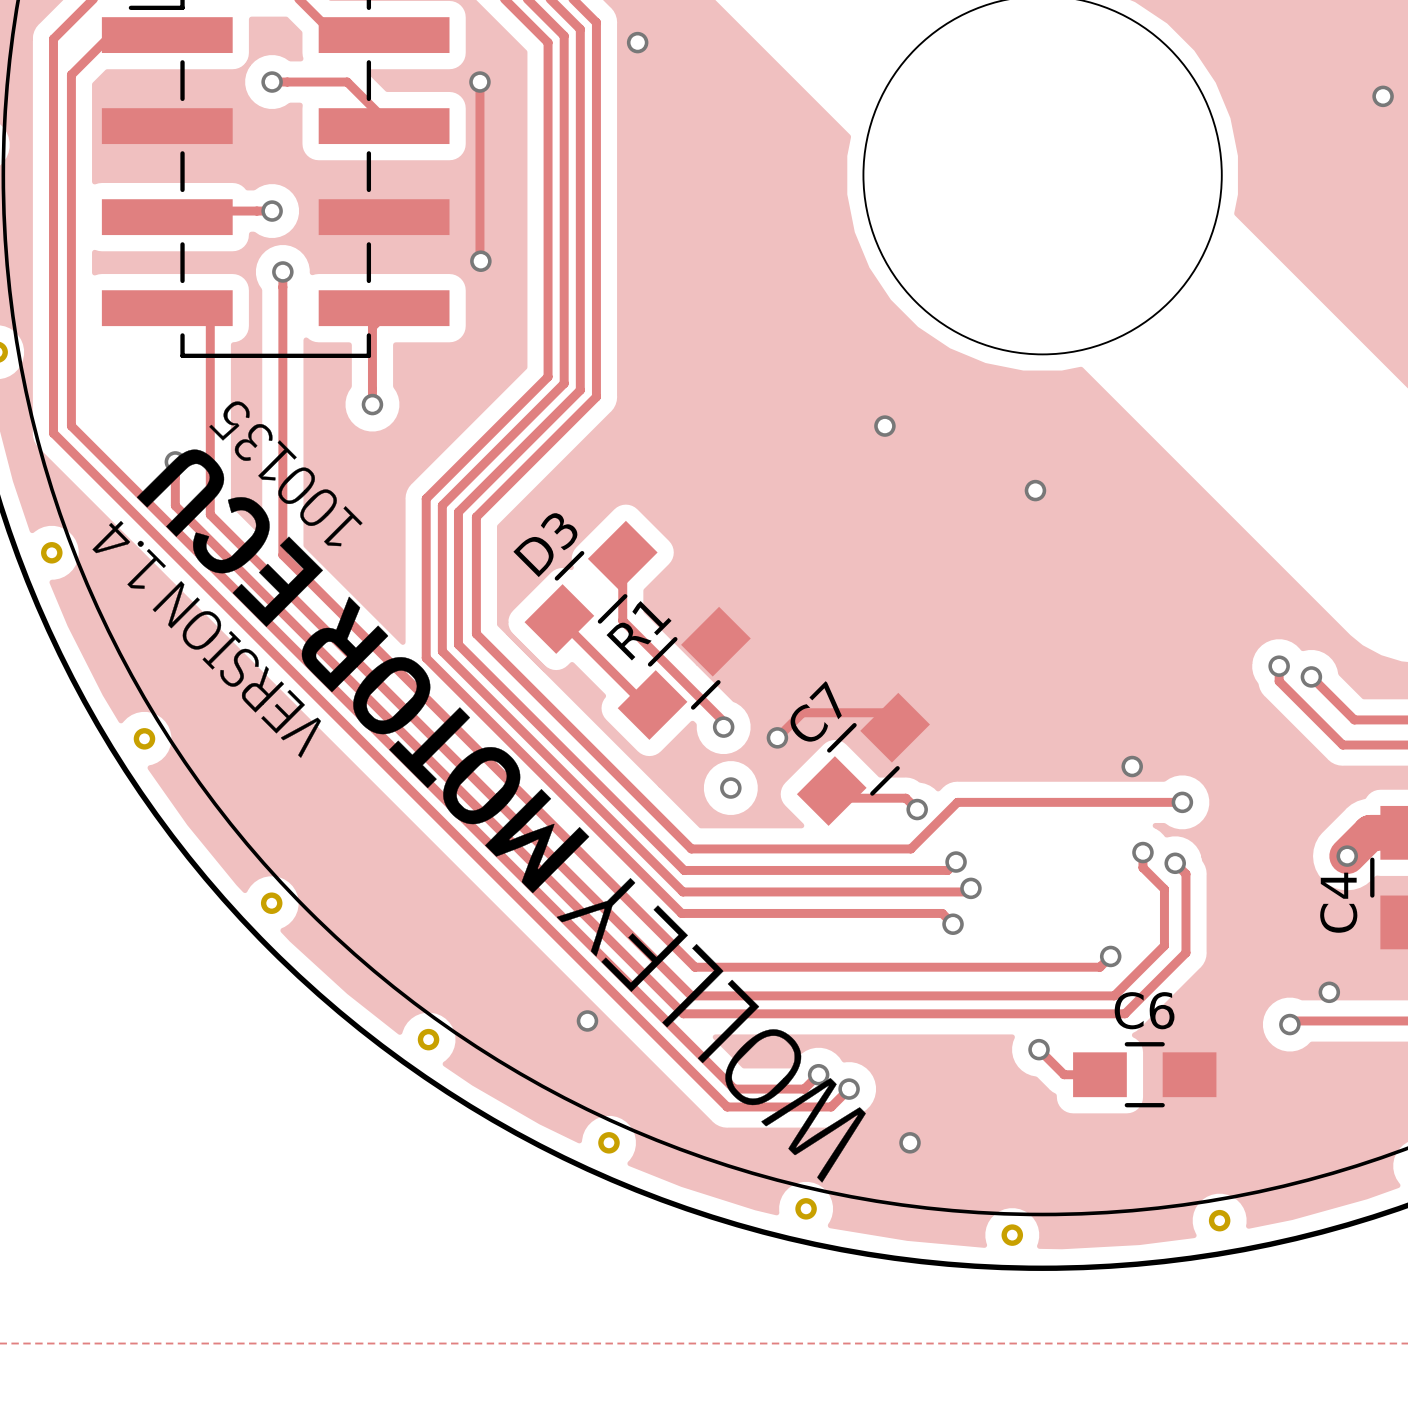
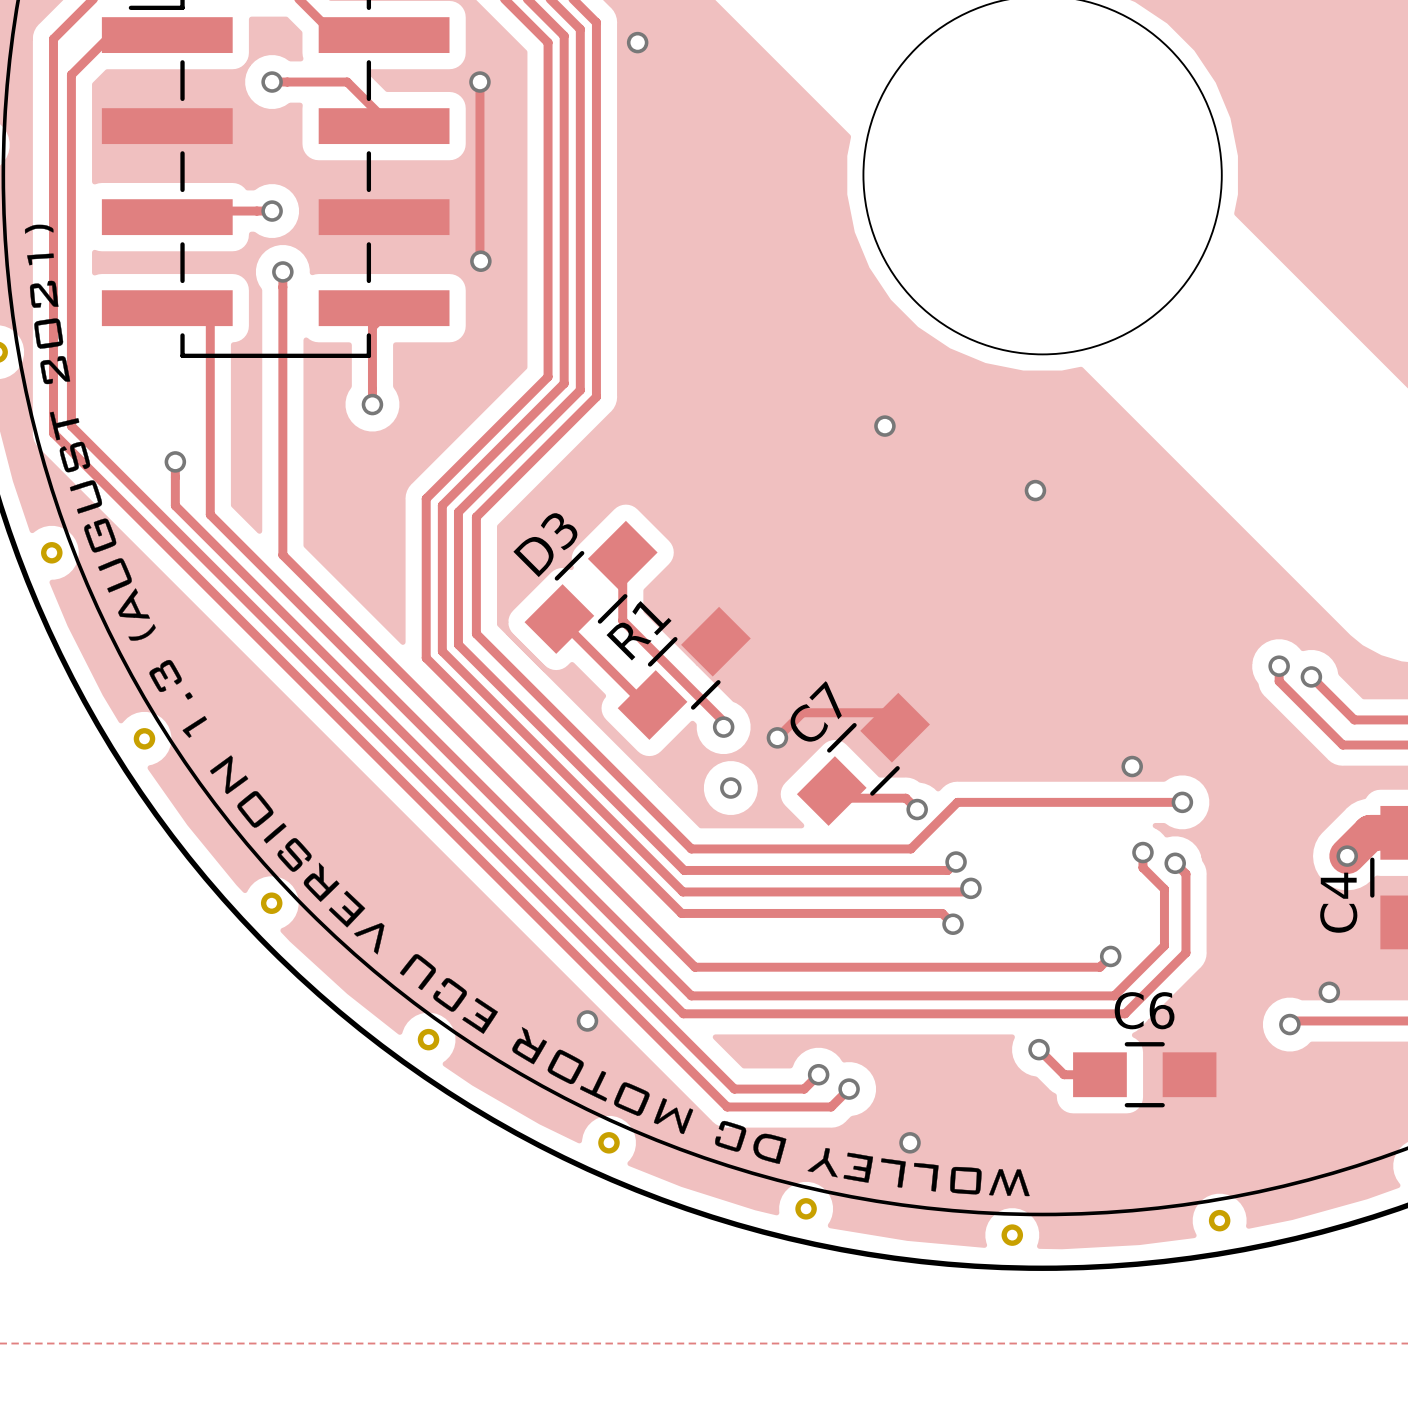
via: (1383, 96) -> none
drawing: none -> [24, 224, 1030, 1197]
drawing: [92, 401, 866, 1183] -> none

